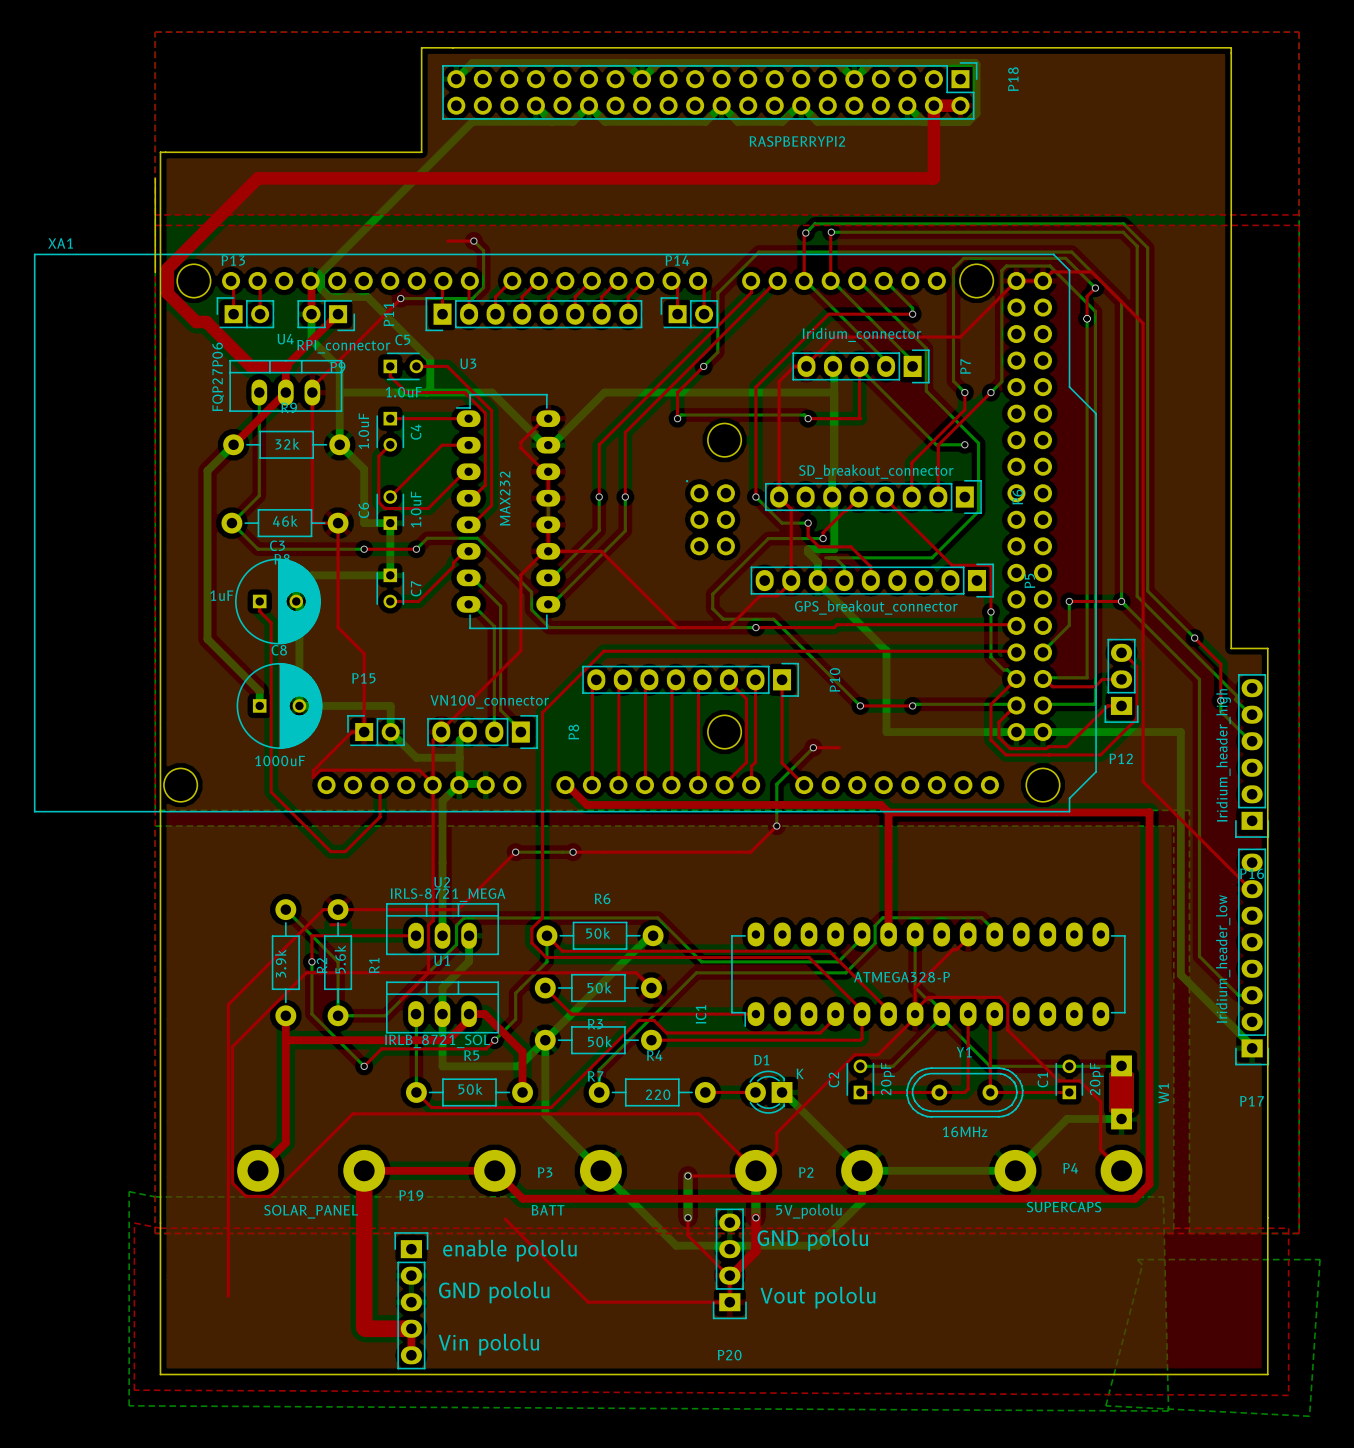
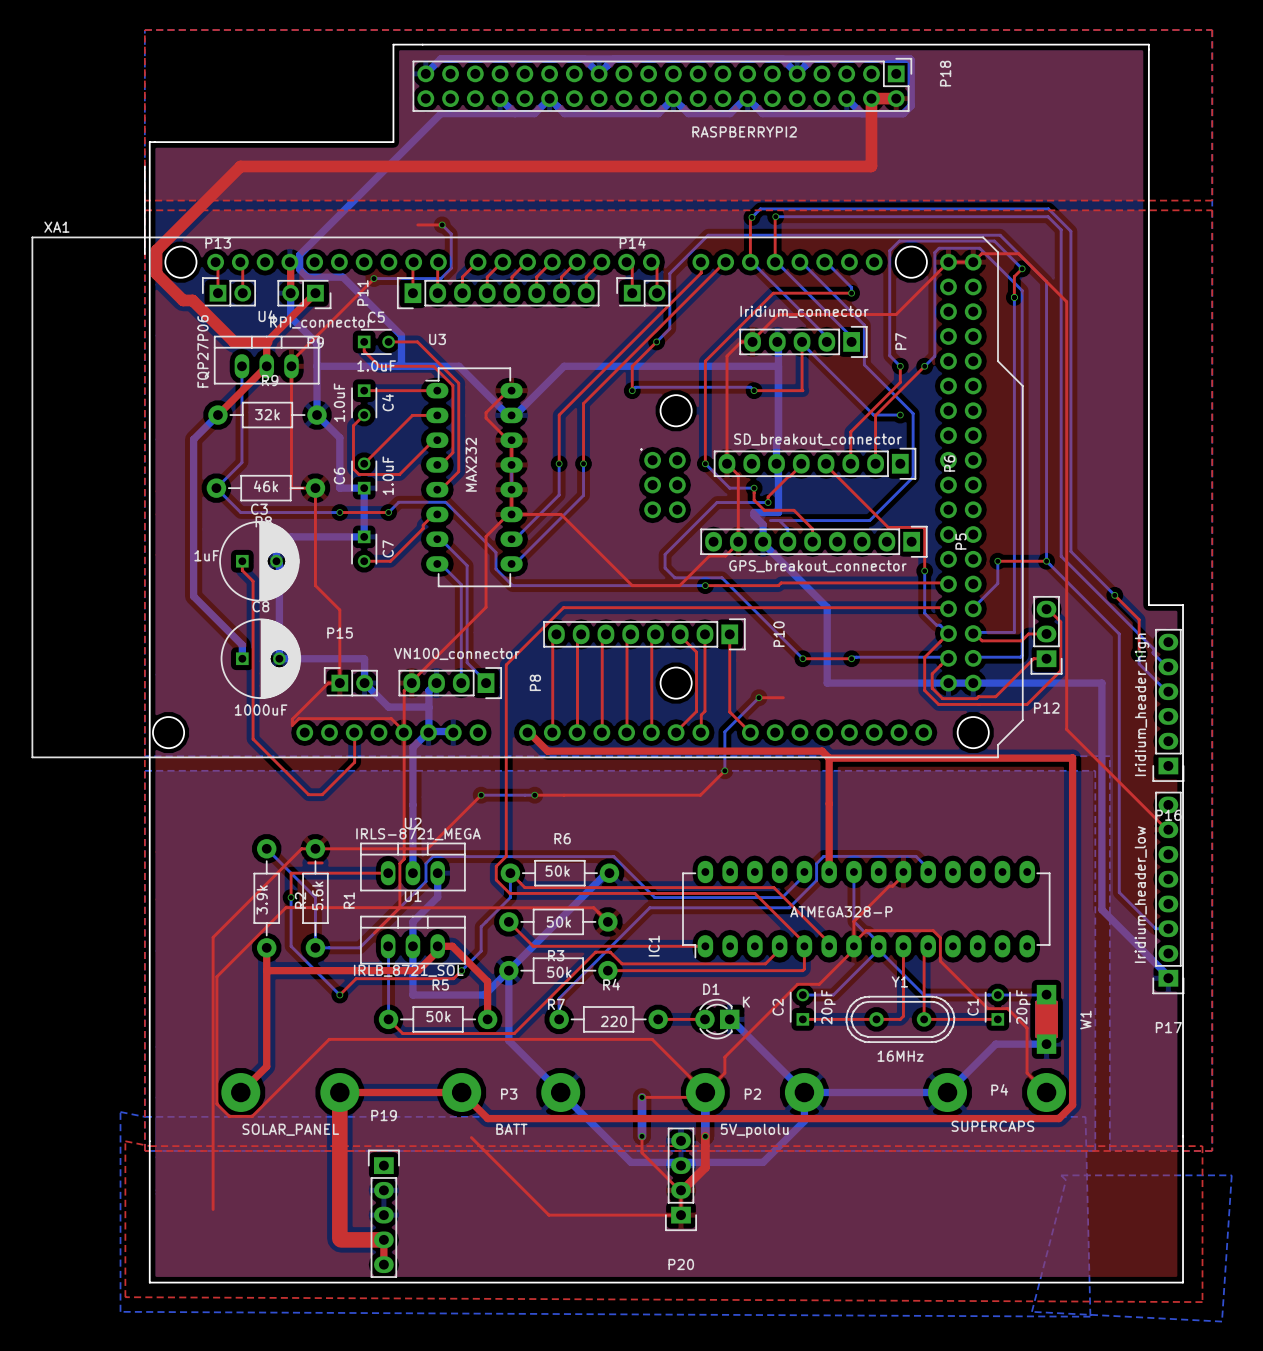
text: GND pololu (812, 1240) -> none
text: enable pololu (509, 1250) -> none
text: GND pololu (494, 1292) -> none
text: Vout pololu (817, 1297) -> none
text: Vin pololu (488, 1344) -> none

